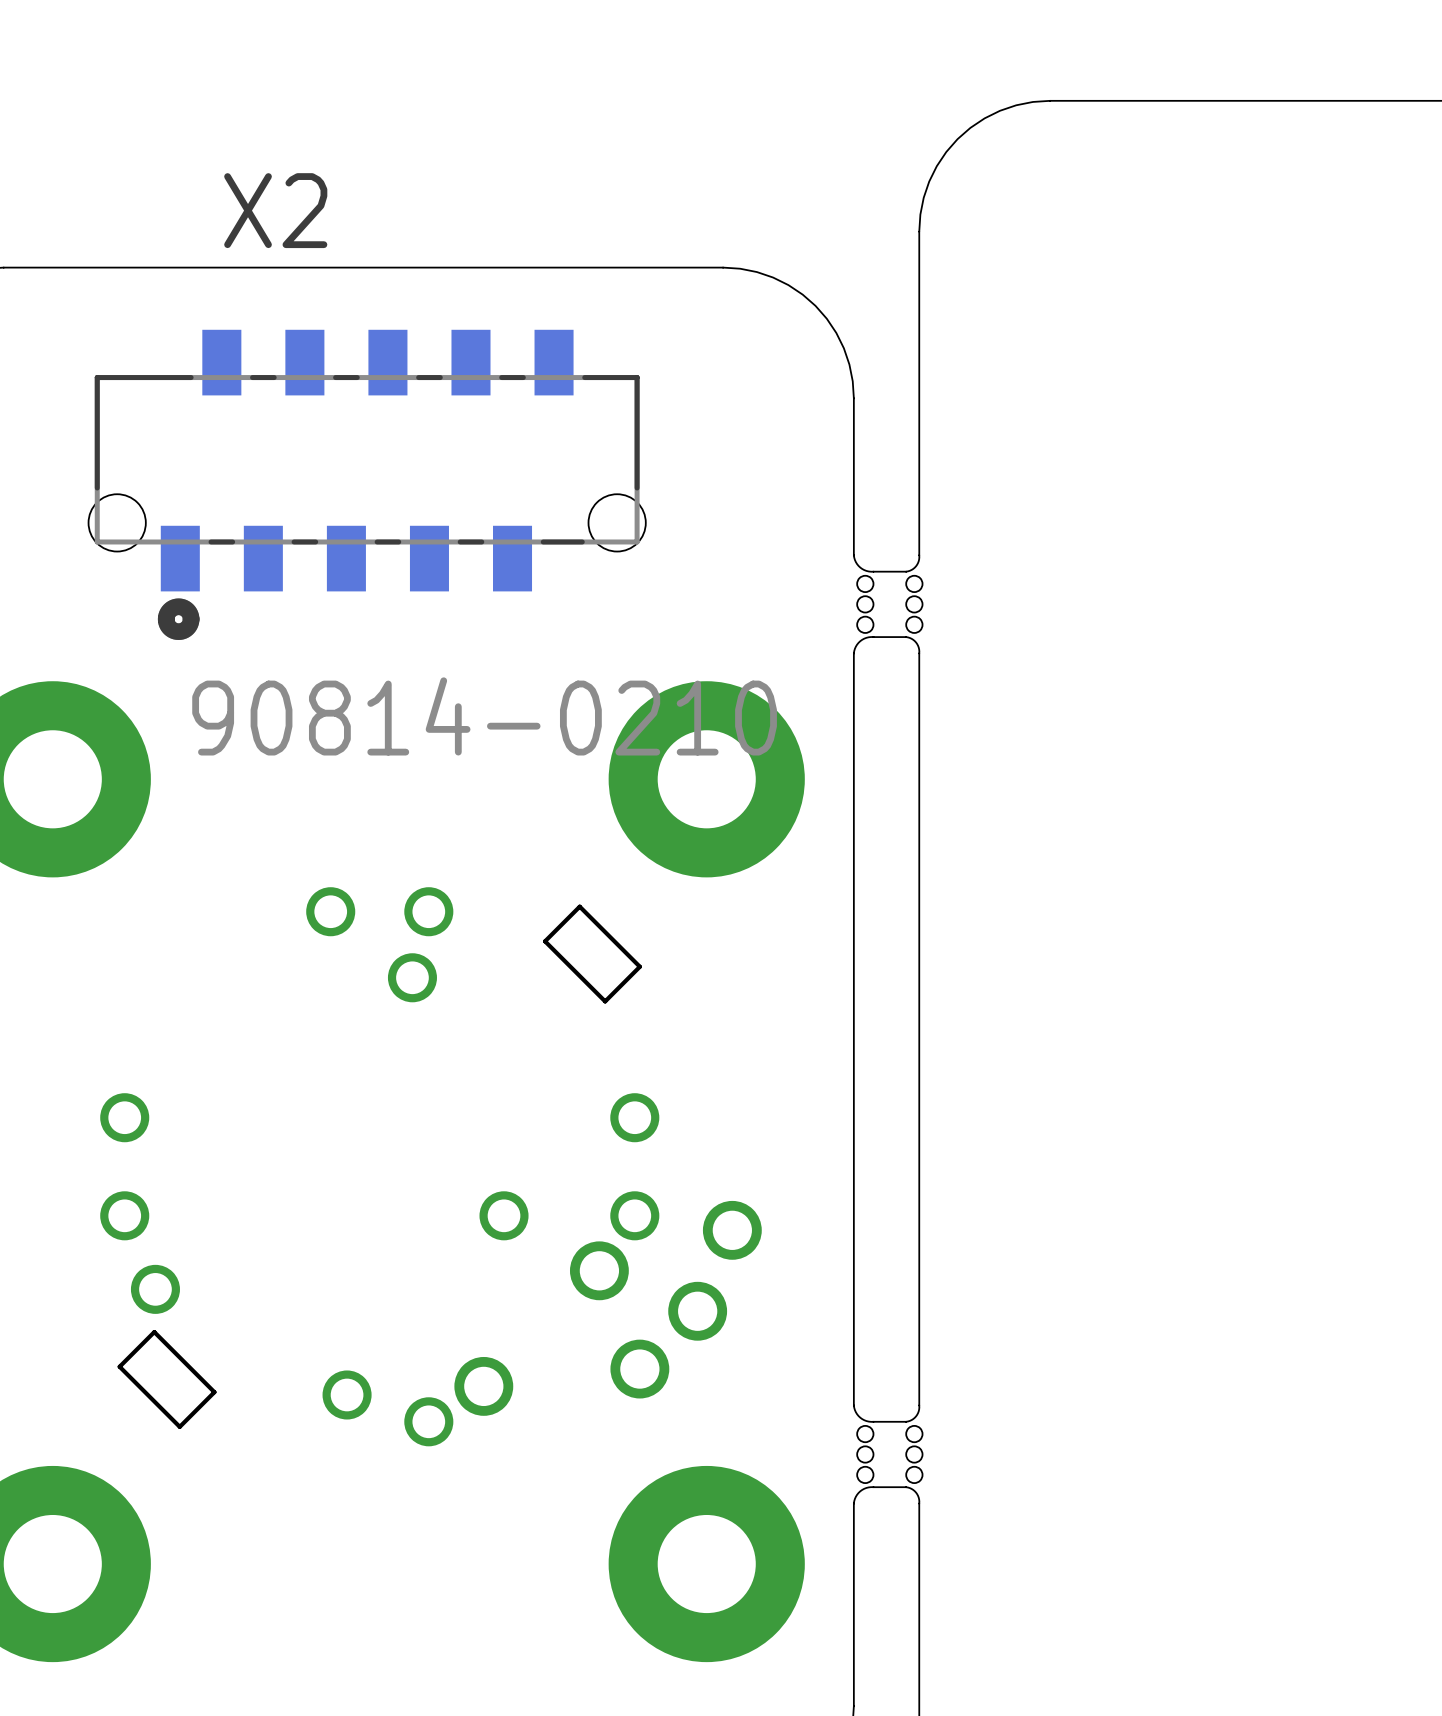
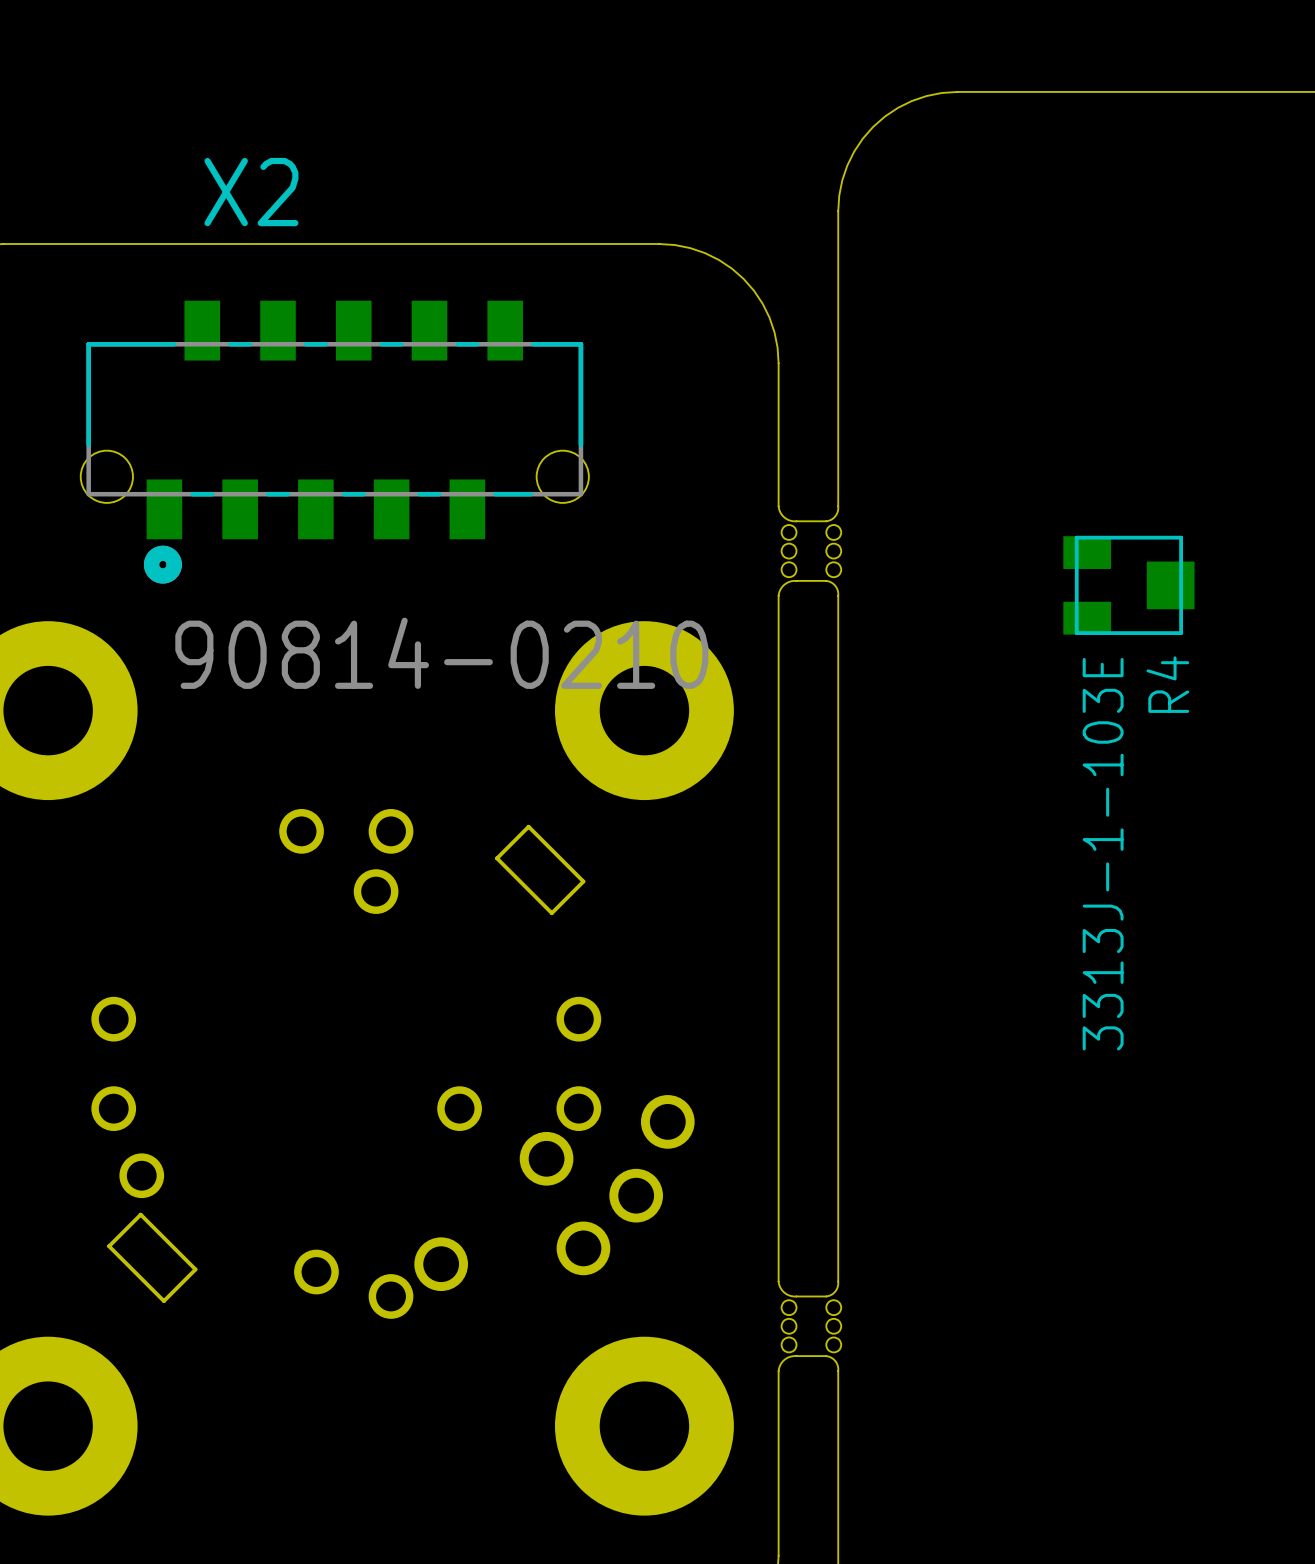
R4: none -> 3313J-1-103E (1128, 585)

